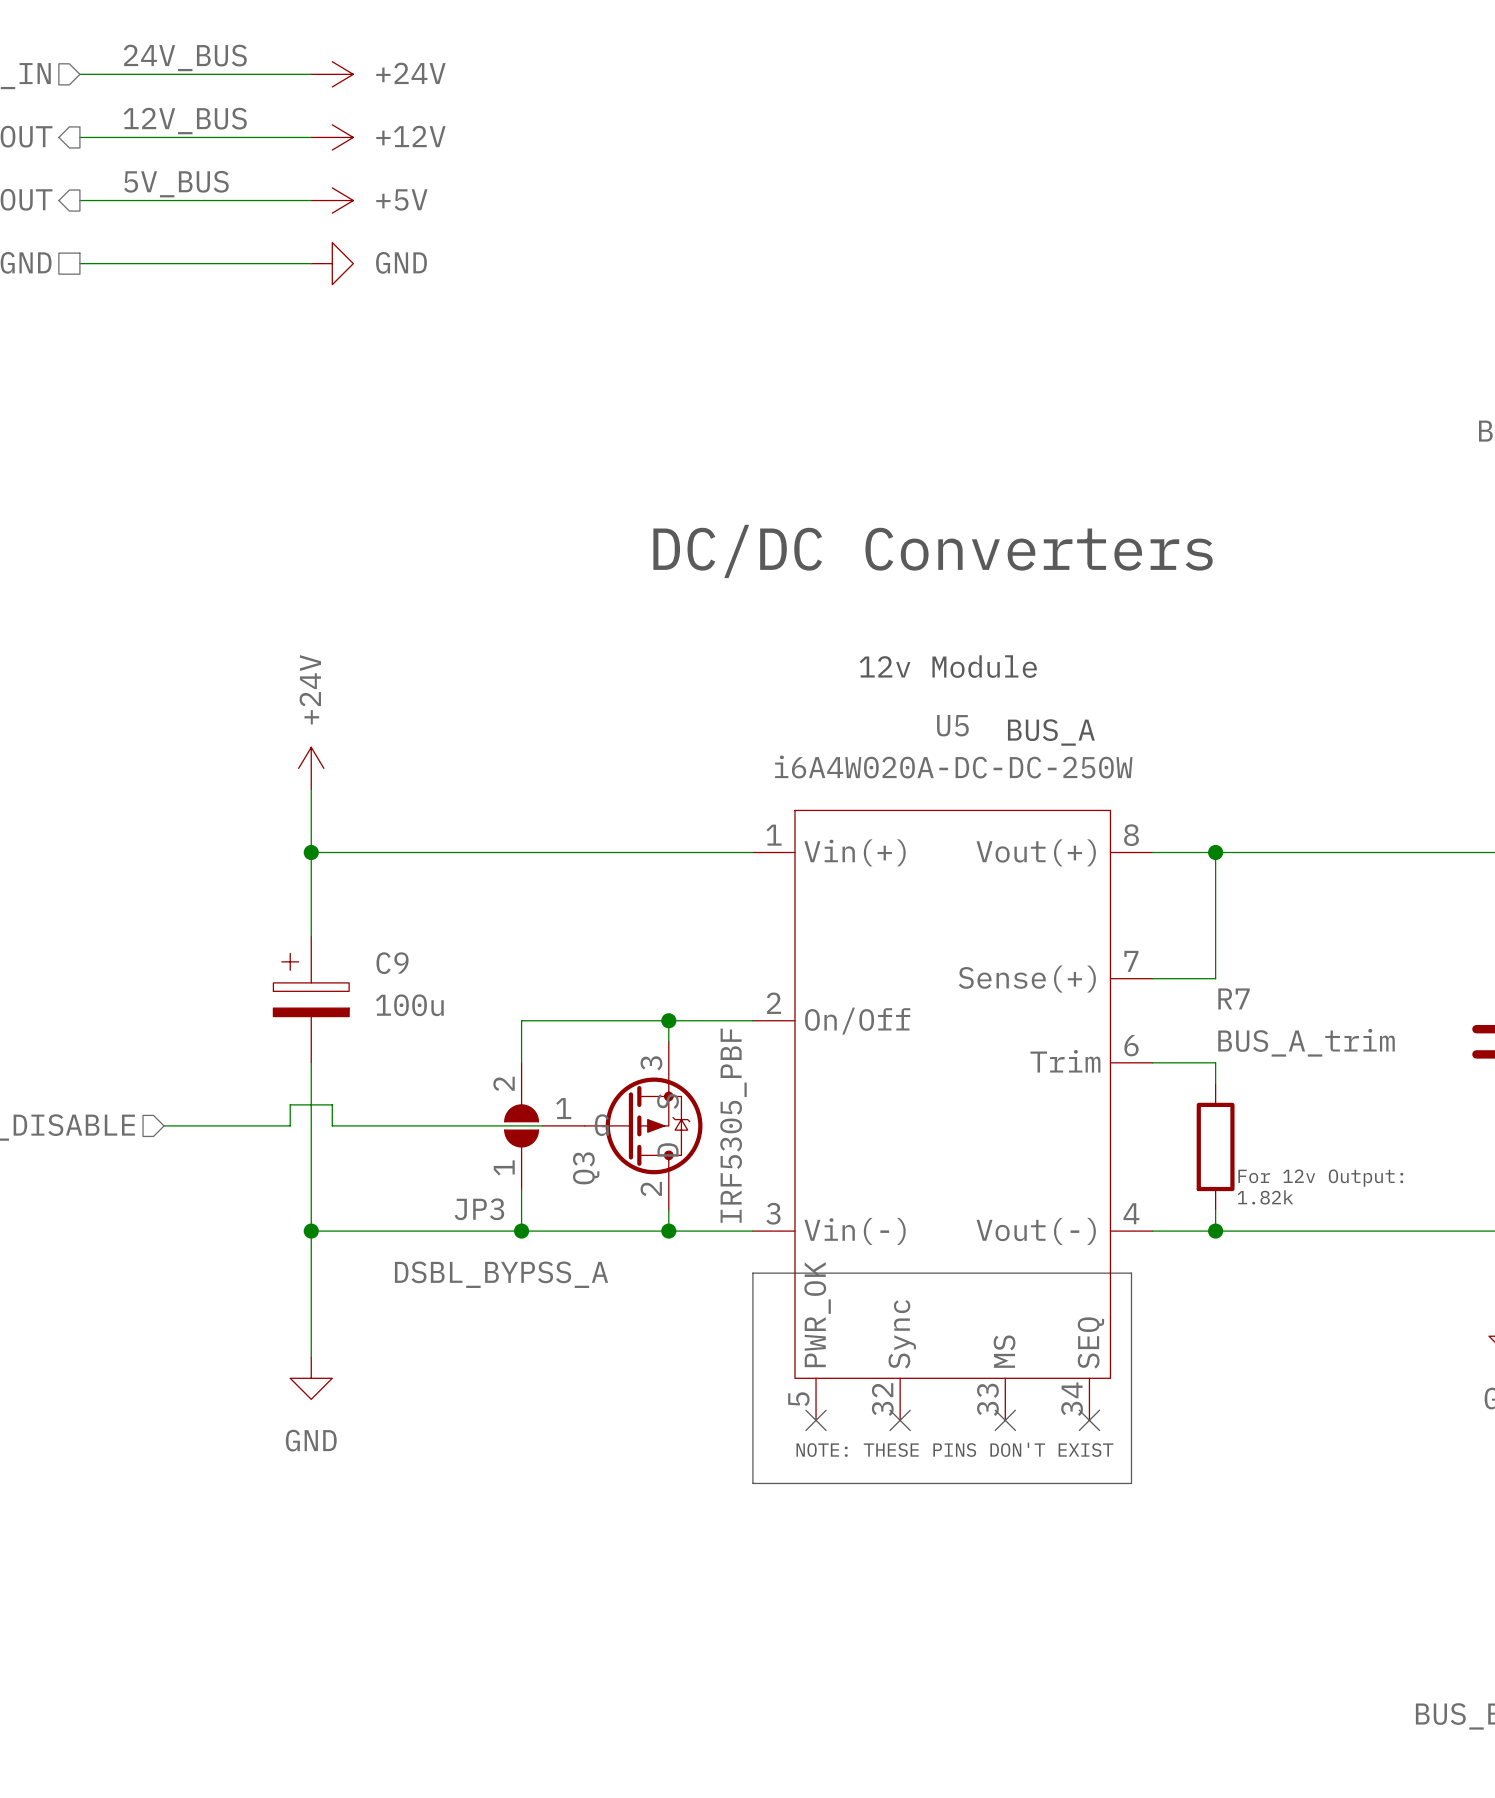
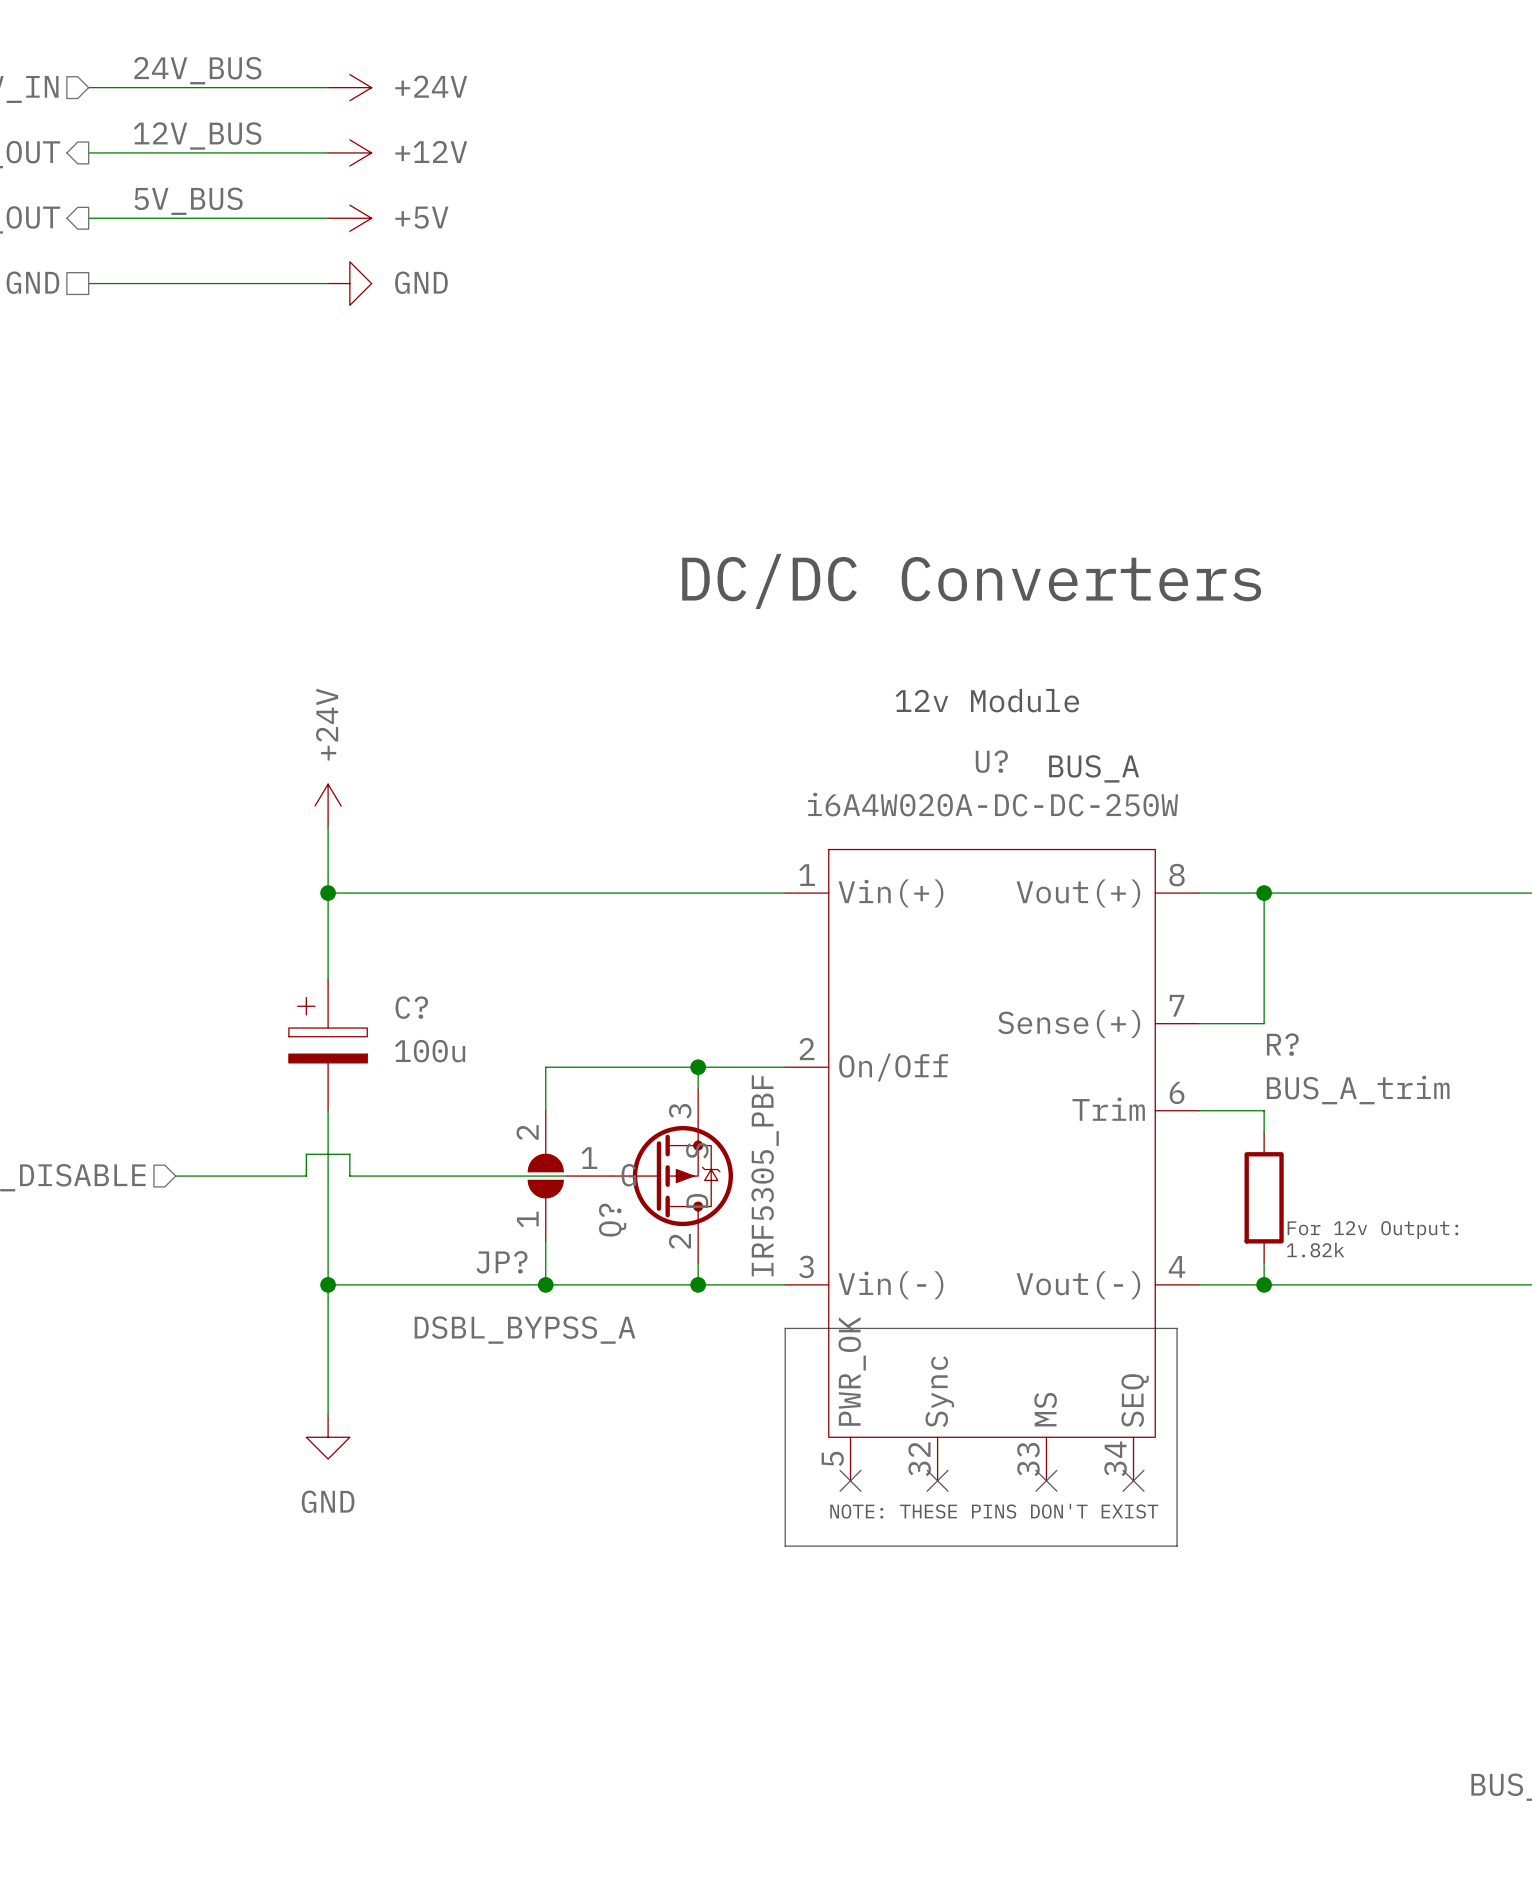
U5 name: U5 (952, 725) -> U? (991, 761)
C9 name: C9 (392, 963) -> C? (411, 1007)
R7 name: R7 (1234, 998) -> R? (1282, 1044)
Q3 name: Q3 (586, 1168) -> Q? (612, 1220)
JP3 name: JP3 (479, 1209) -> JP? (501, 1262)

